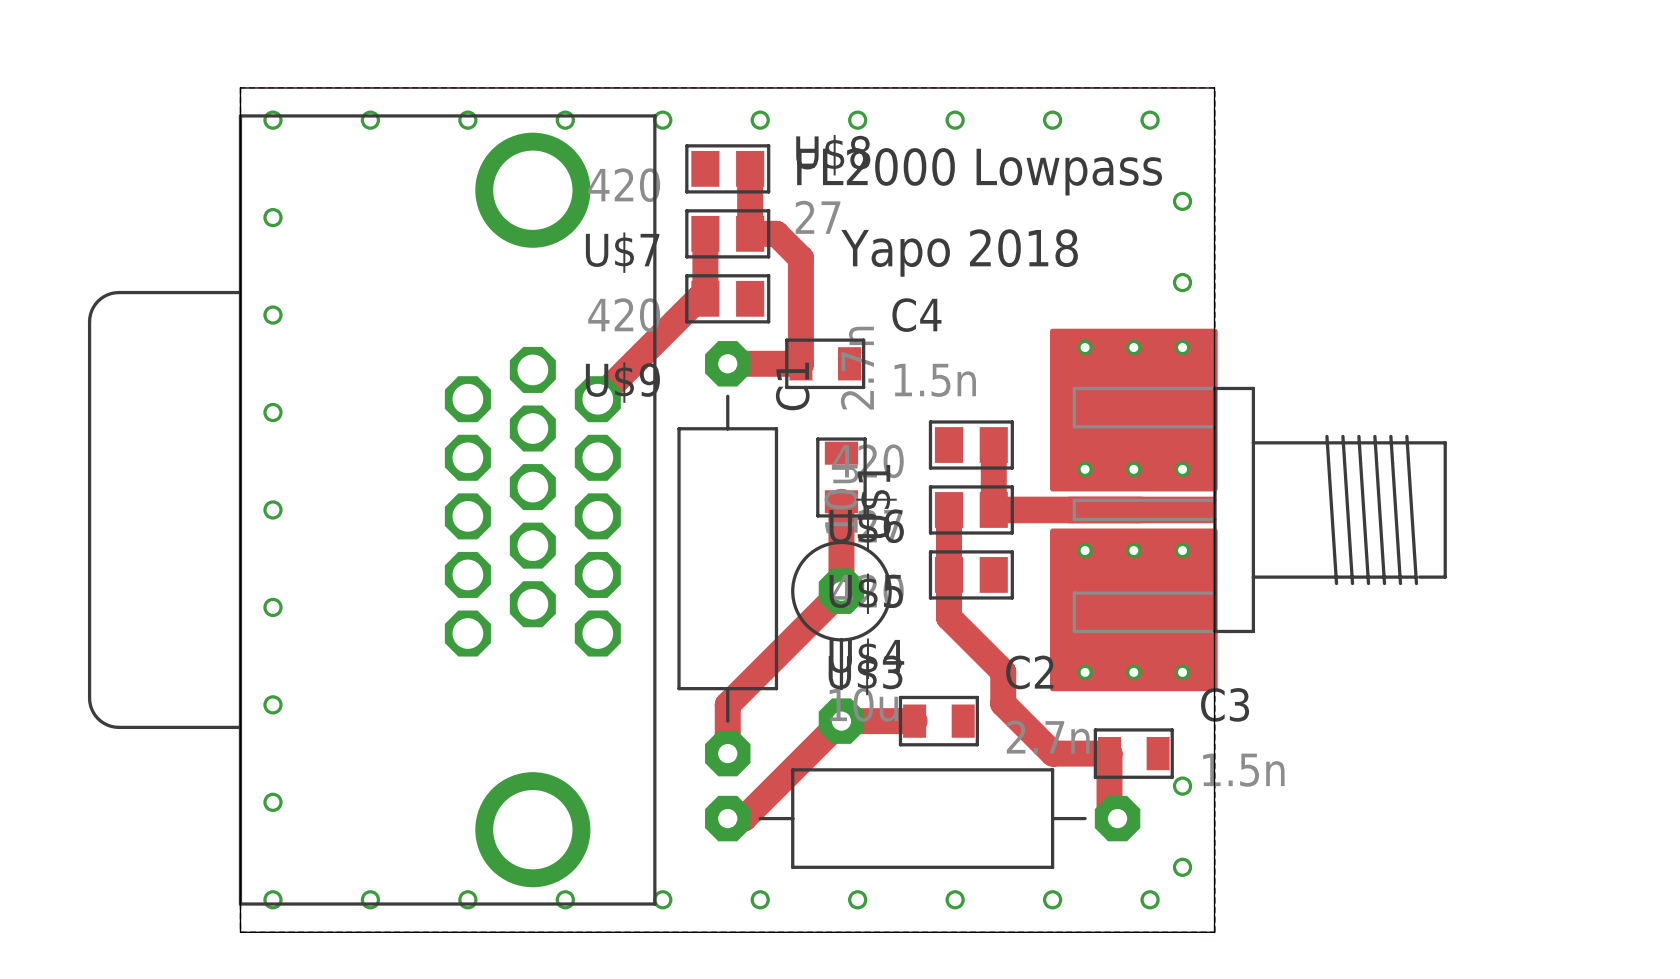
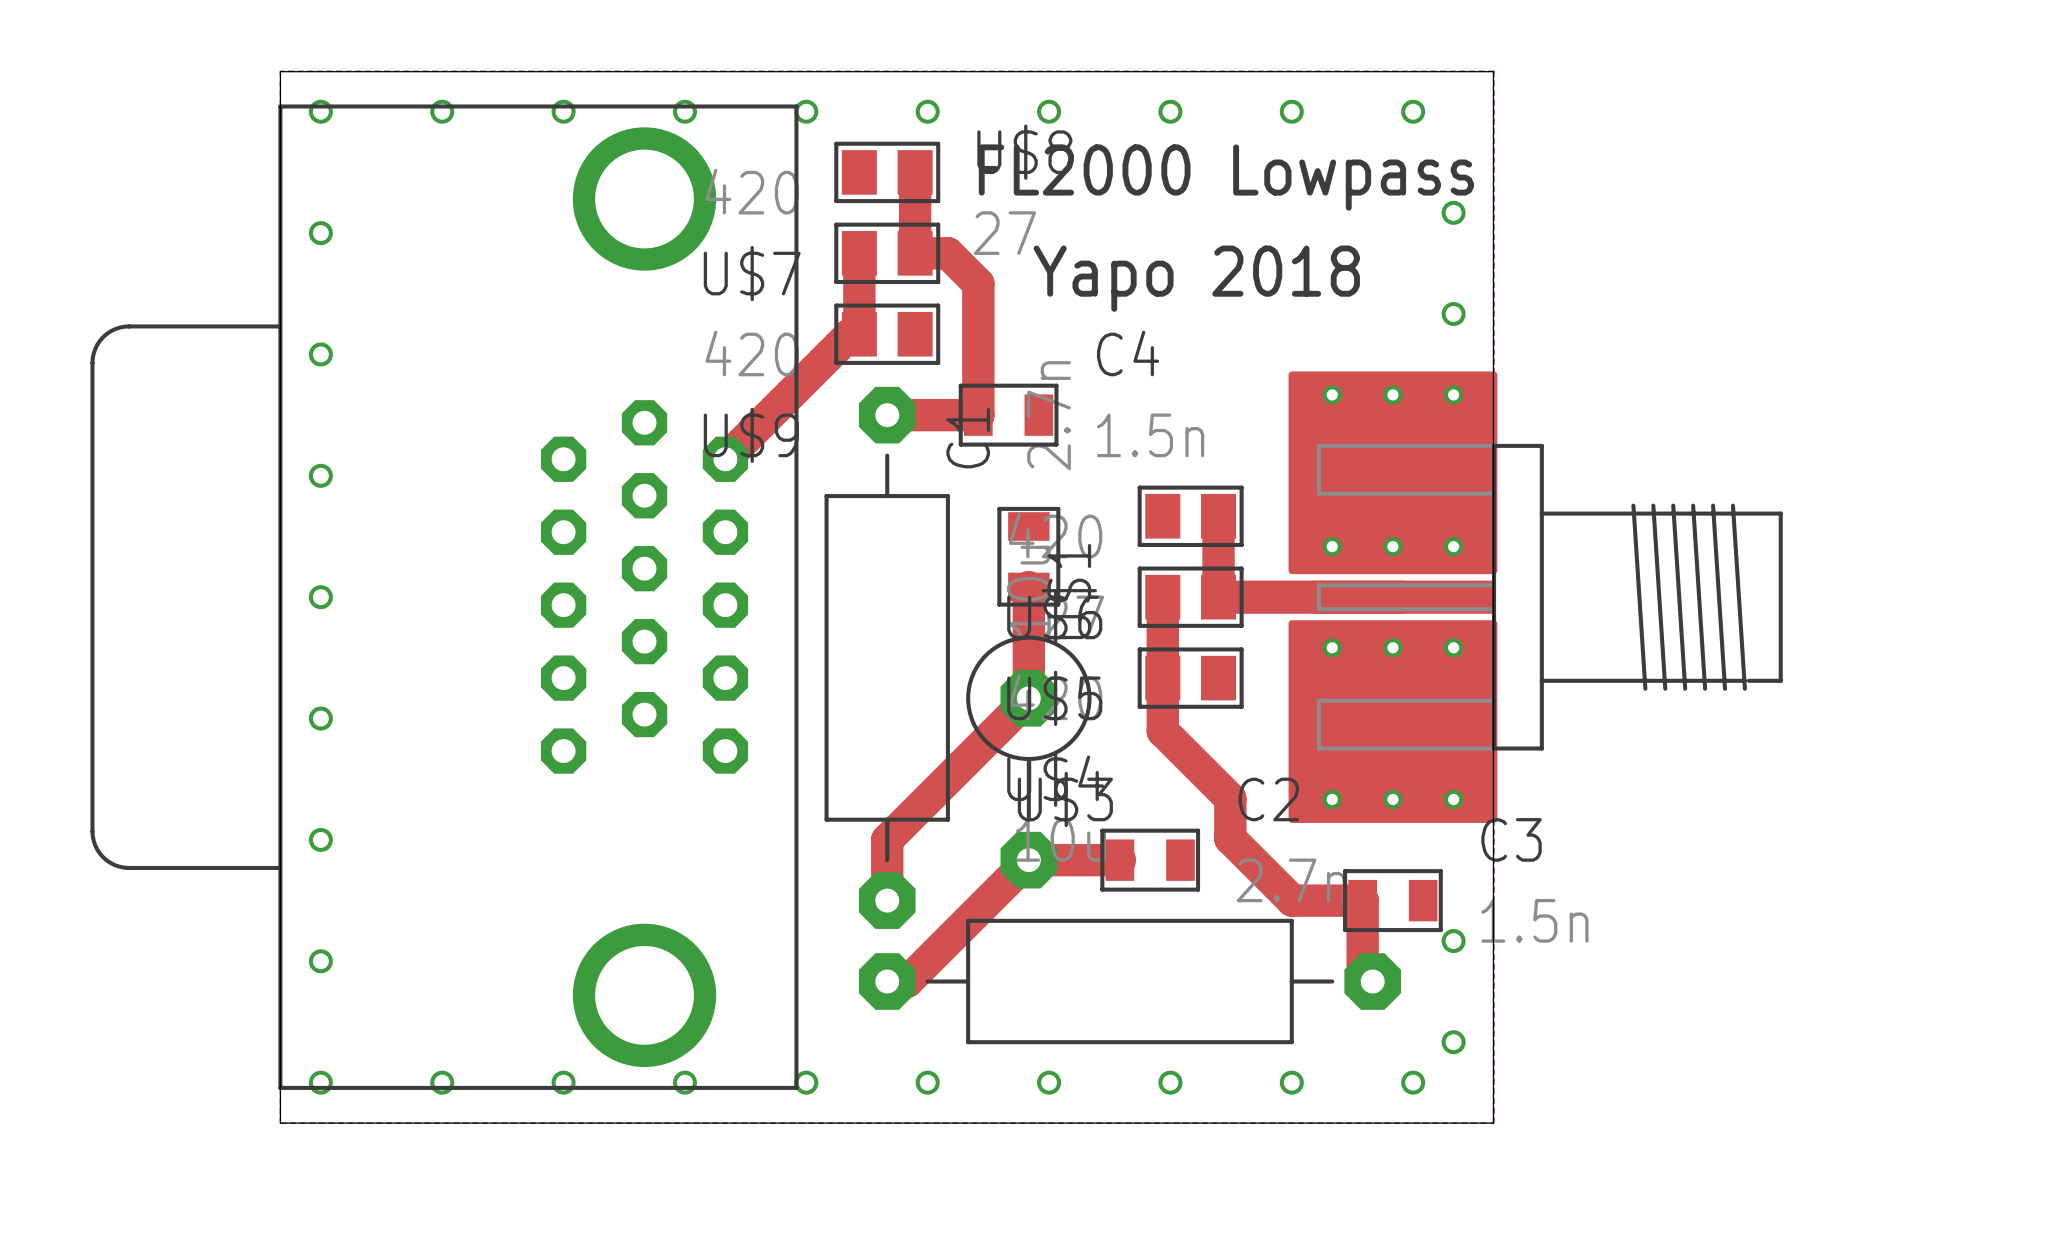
part footprint: [87, 114, 657, 906] -> [90, 104, 799, 1090]

